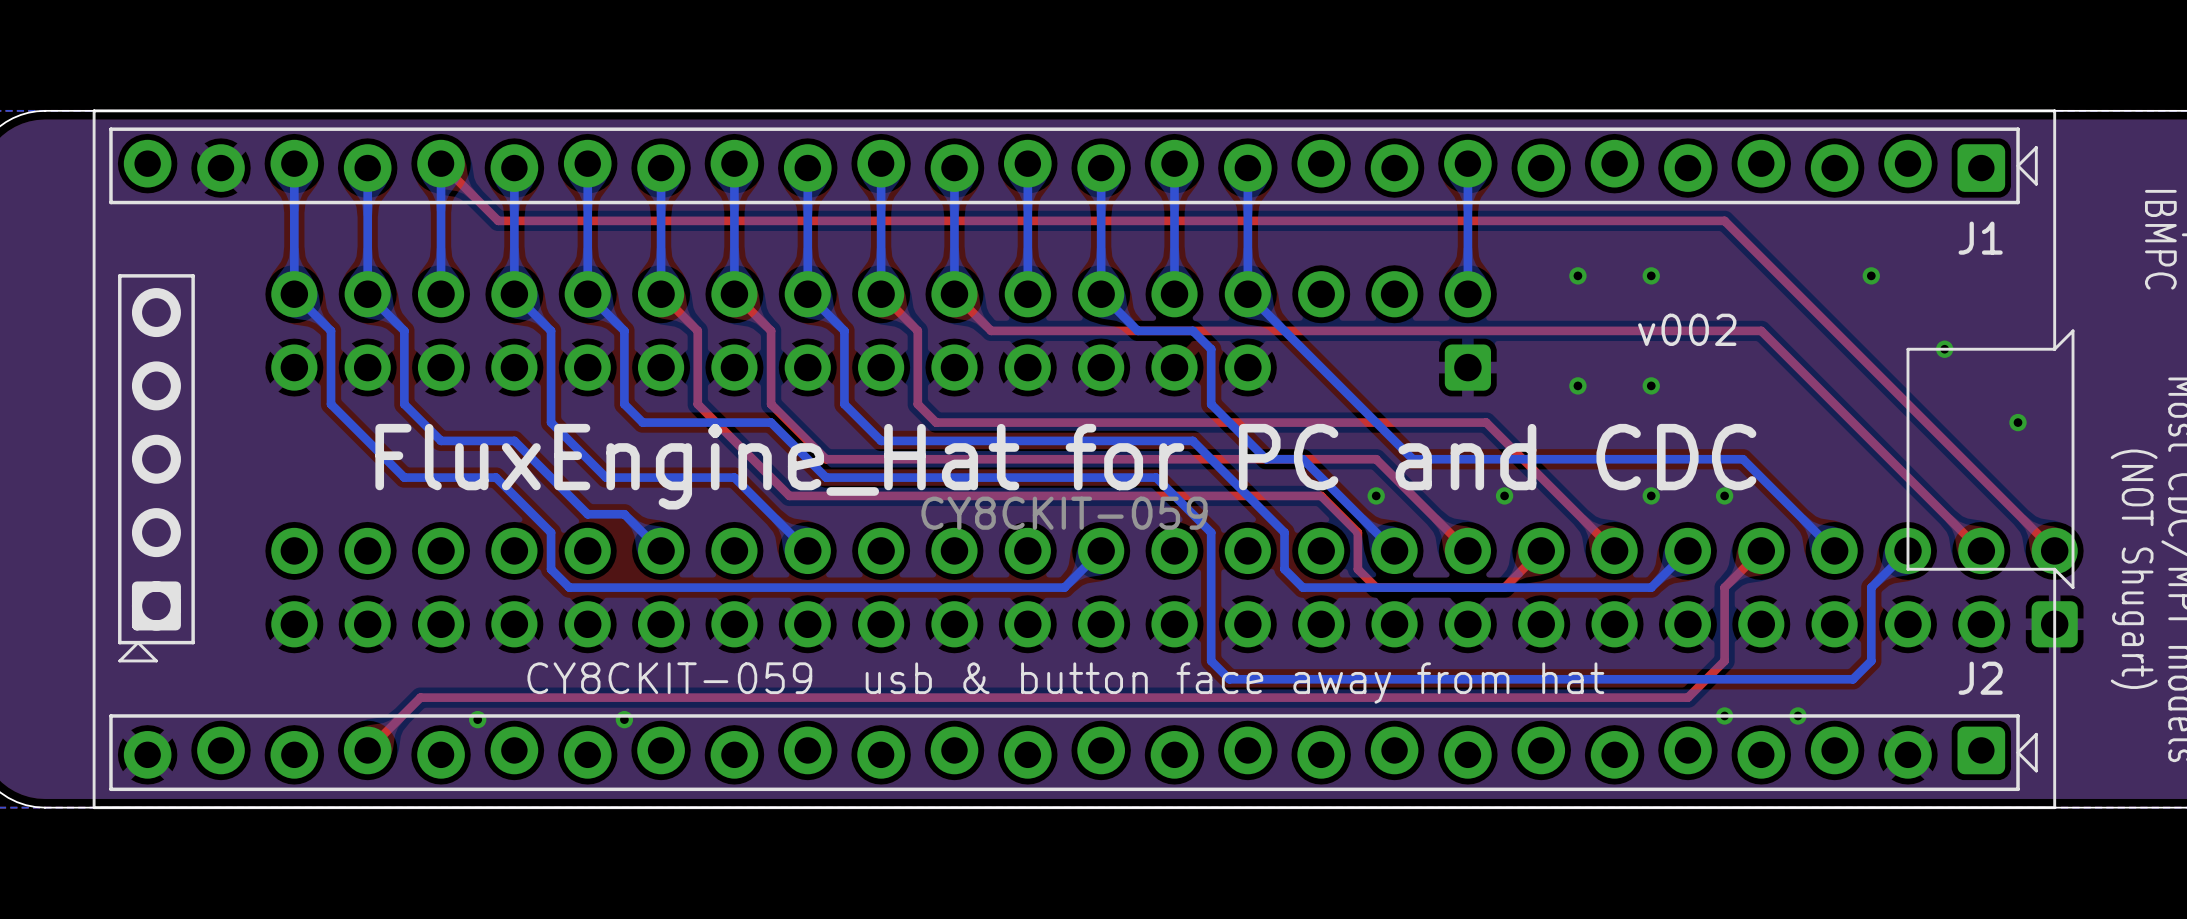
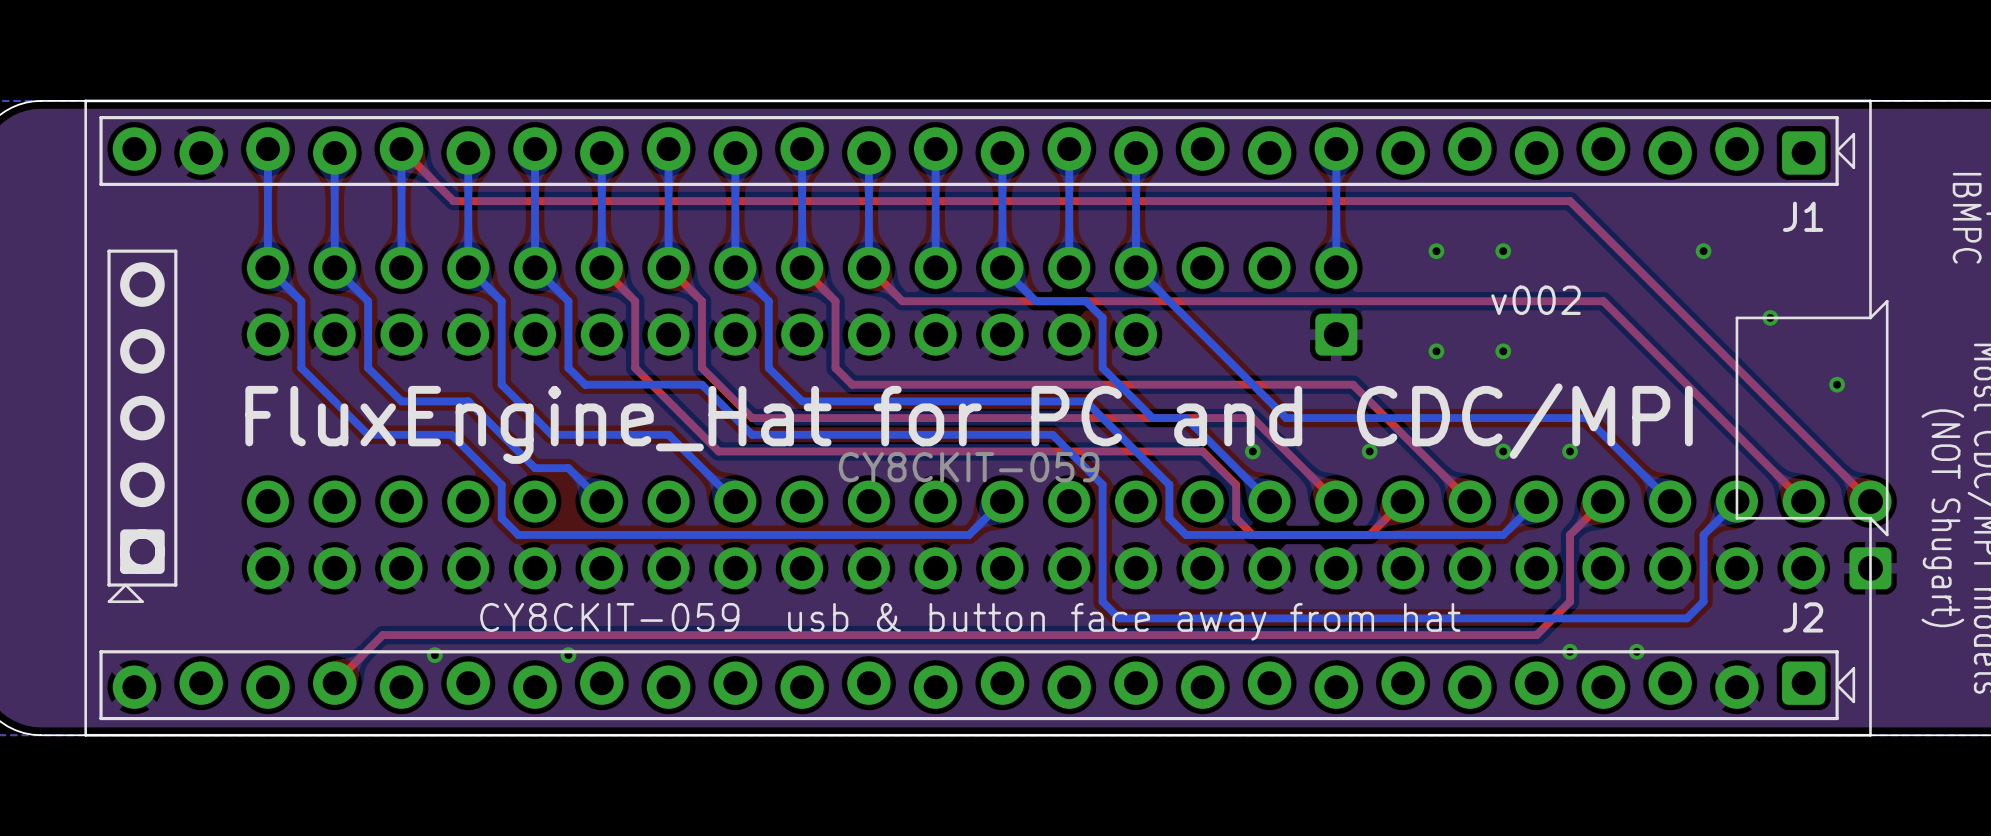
text: FluxEngine_Hat for PC and CDC (1065, 466) -> FluxEngine_Hat for PC and CDC/MPI (969, 423)

